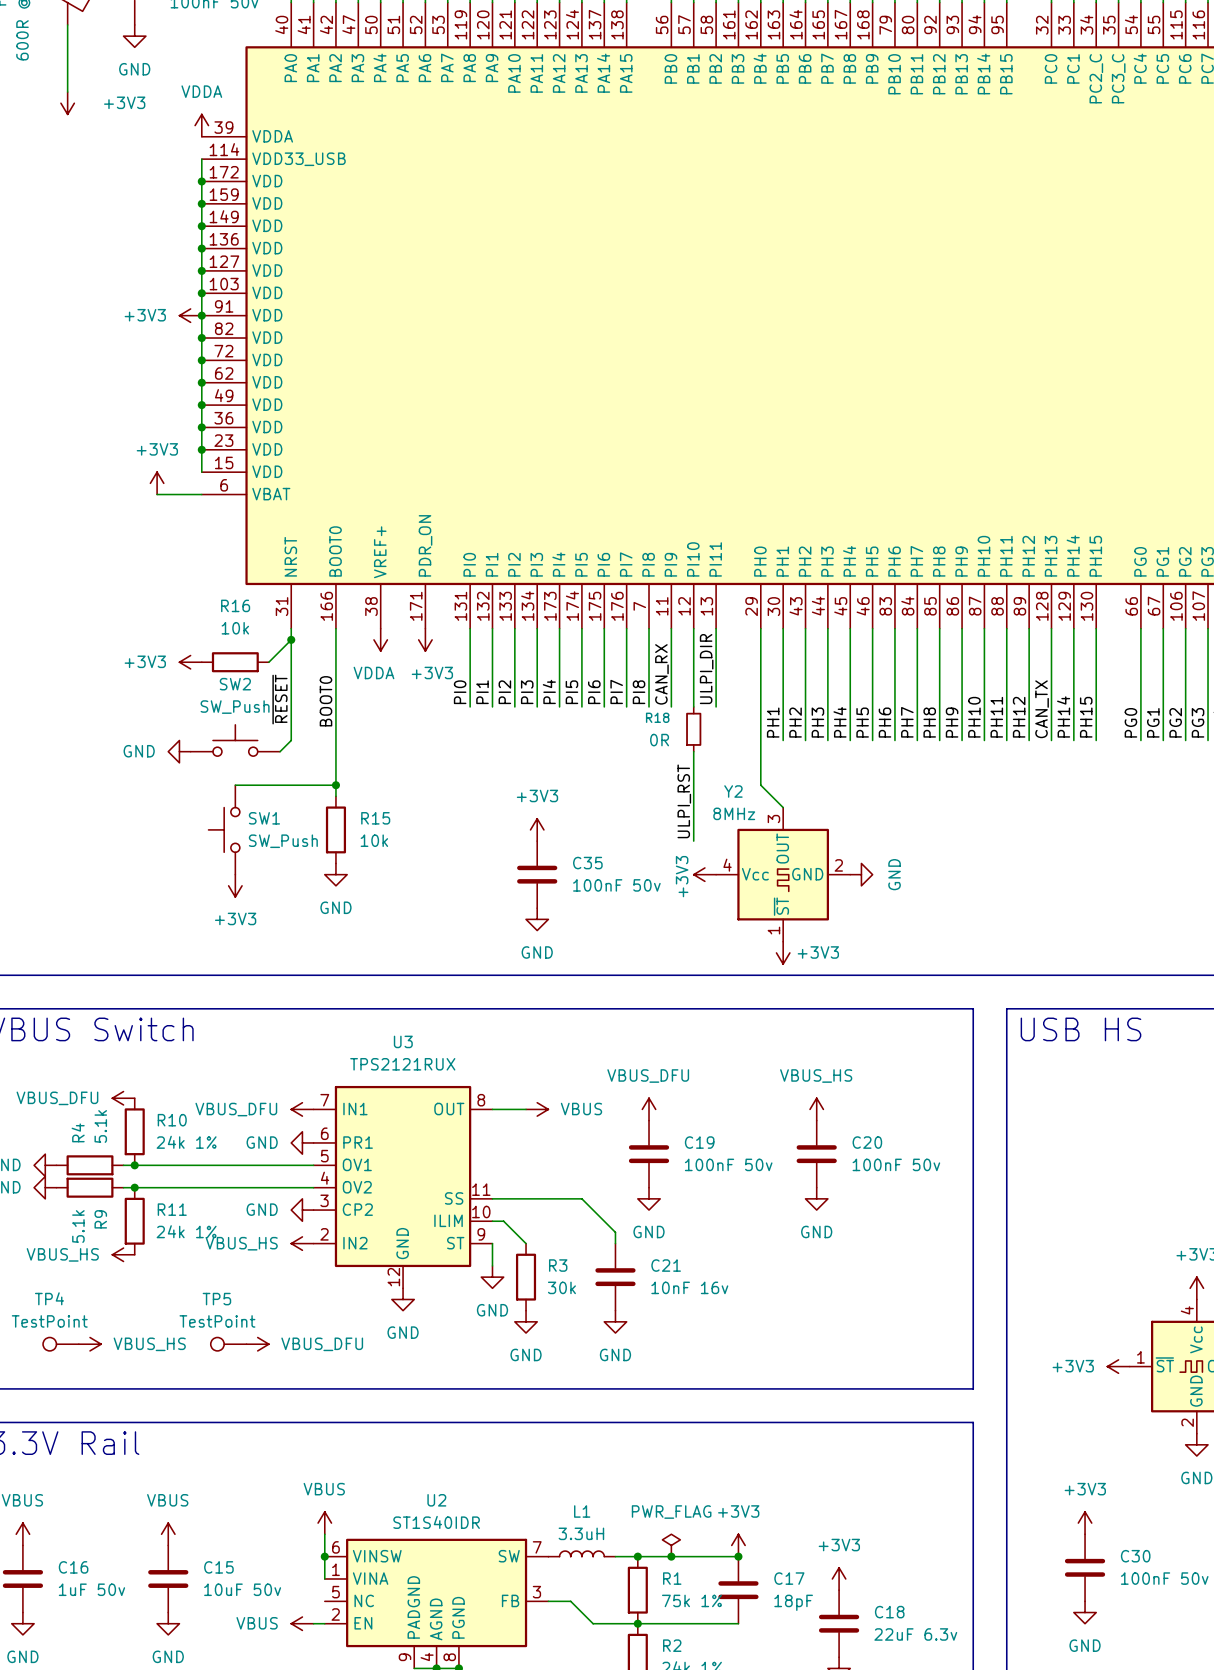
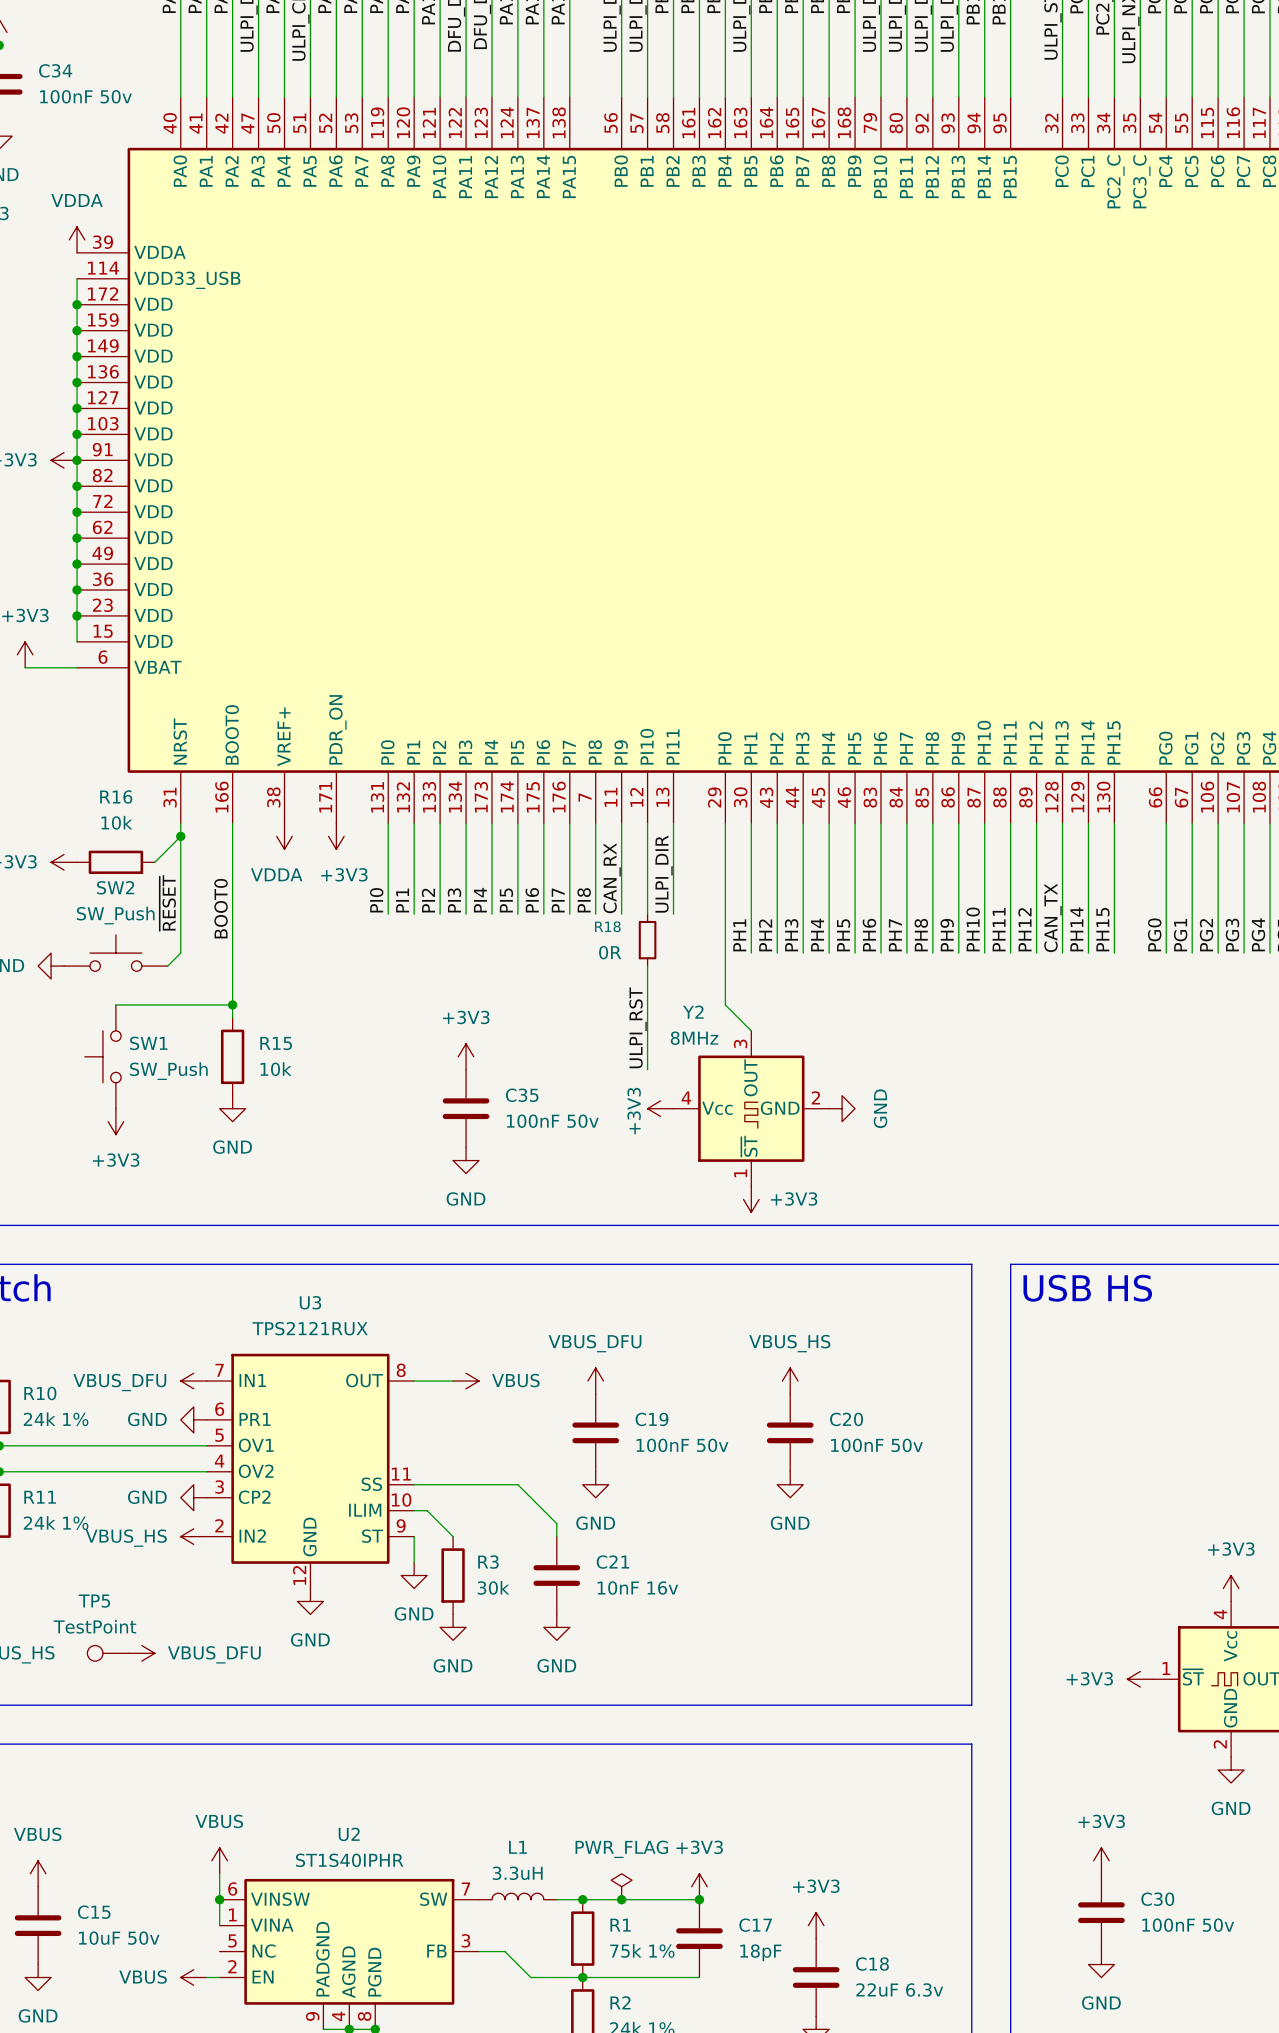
U2 value: ST1S40IDR (436, 1522) -> ST1S40IPHR (349, 1860)

